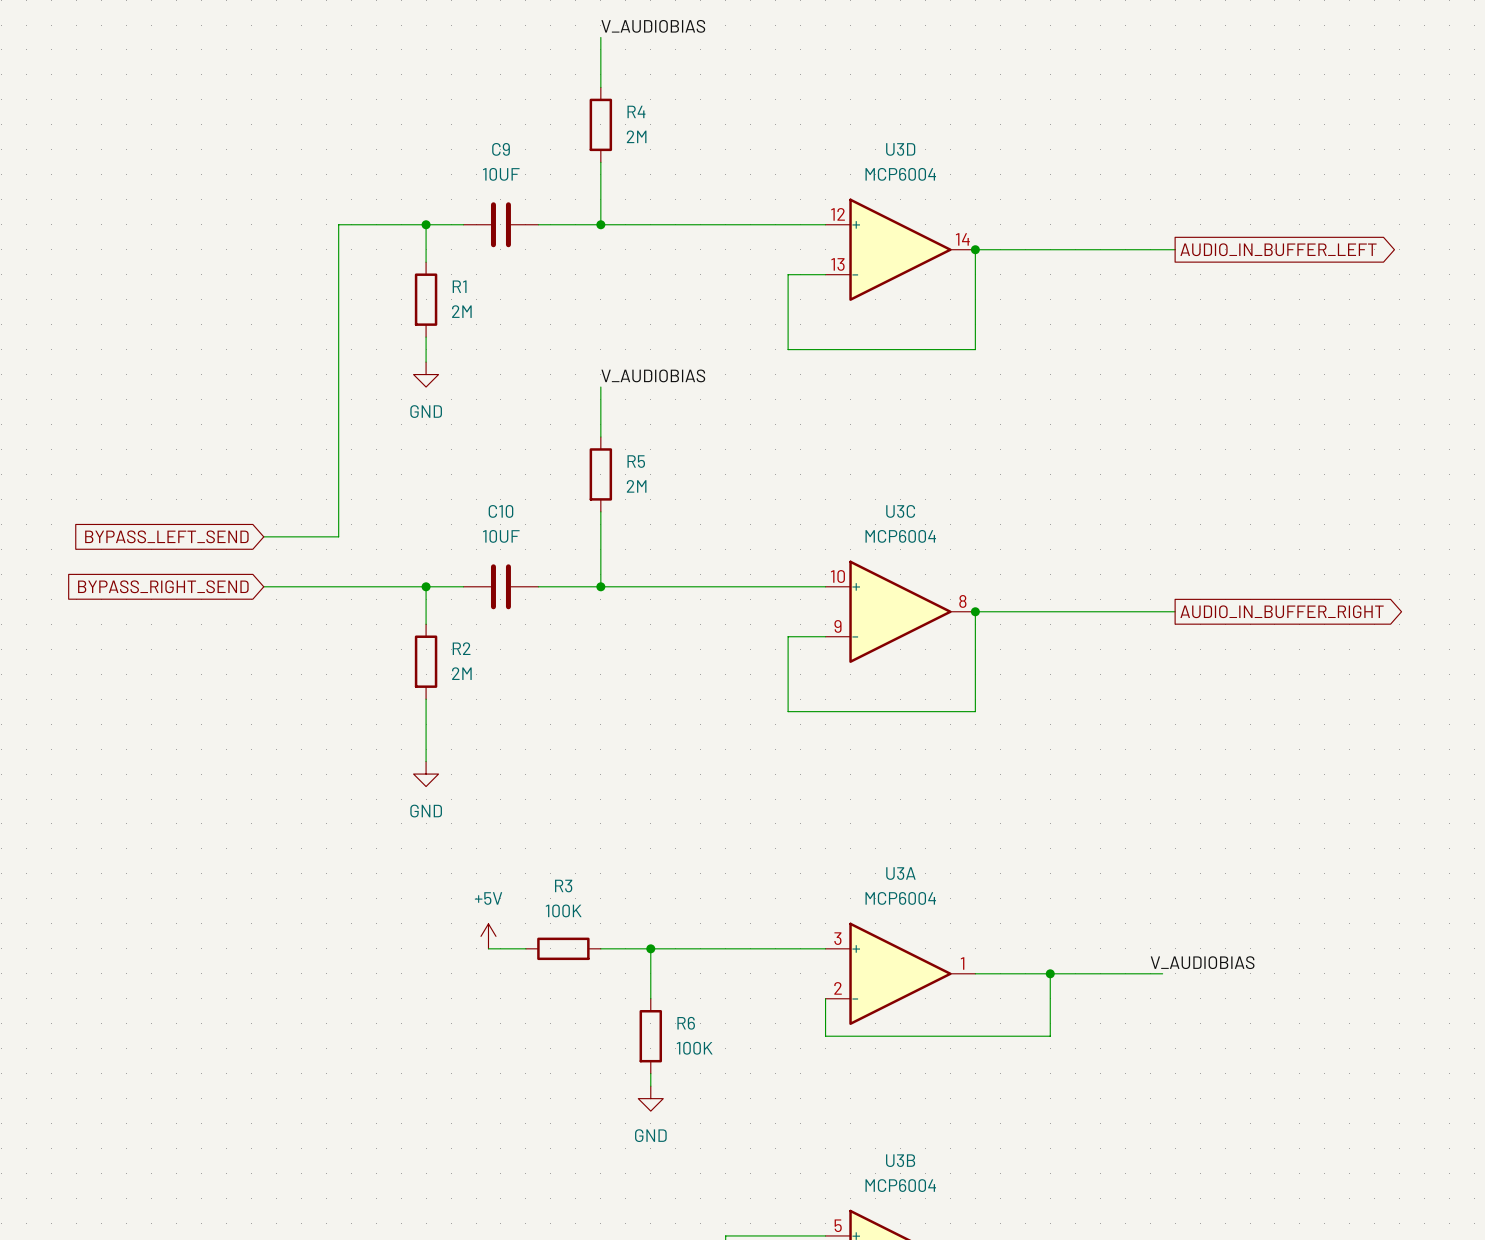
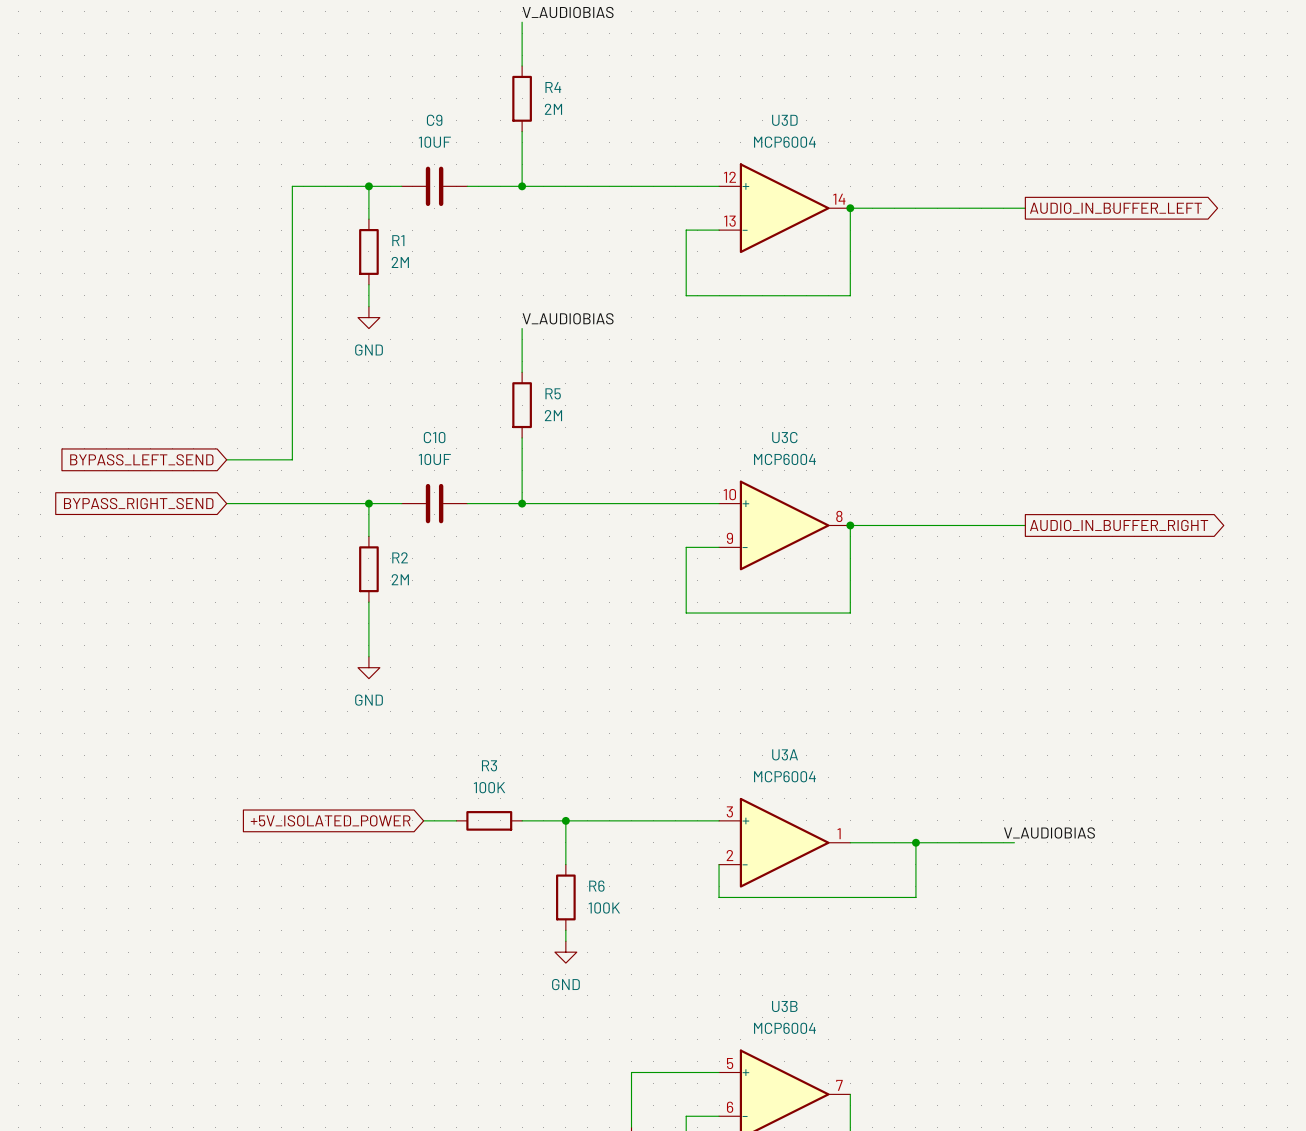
power symbol: +5V (488, 936) -> none
global label: none -> +5V_ISOLATED_POWER (330, 820)

